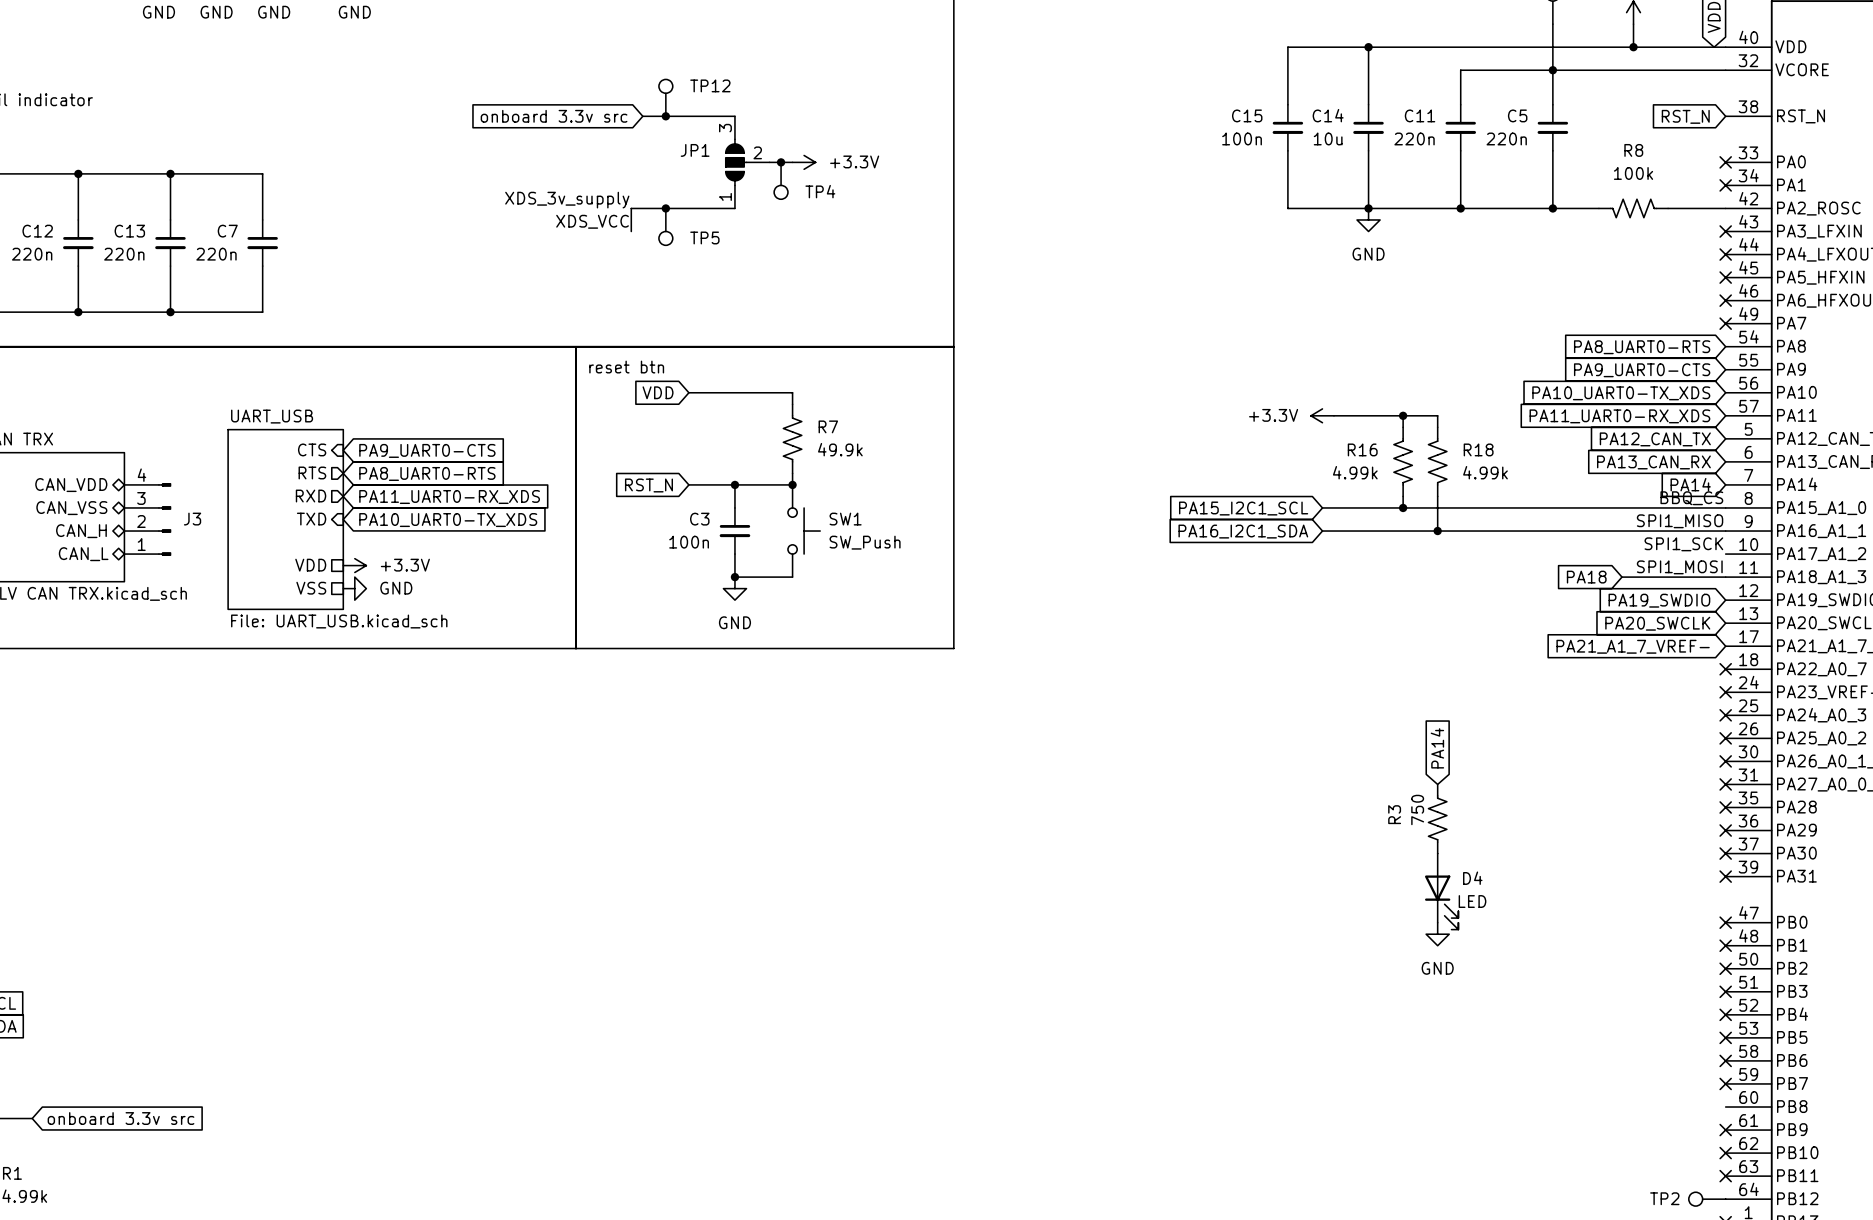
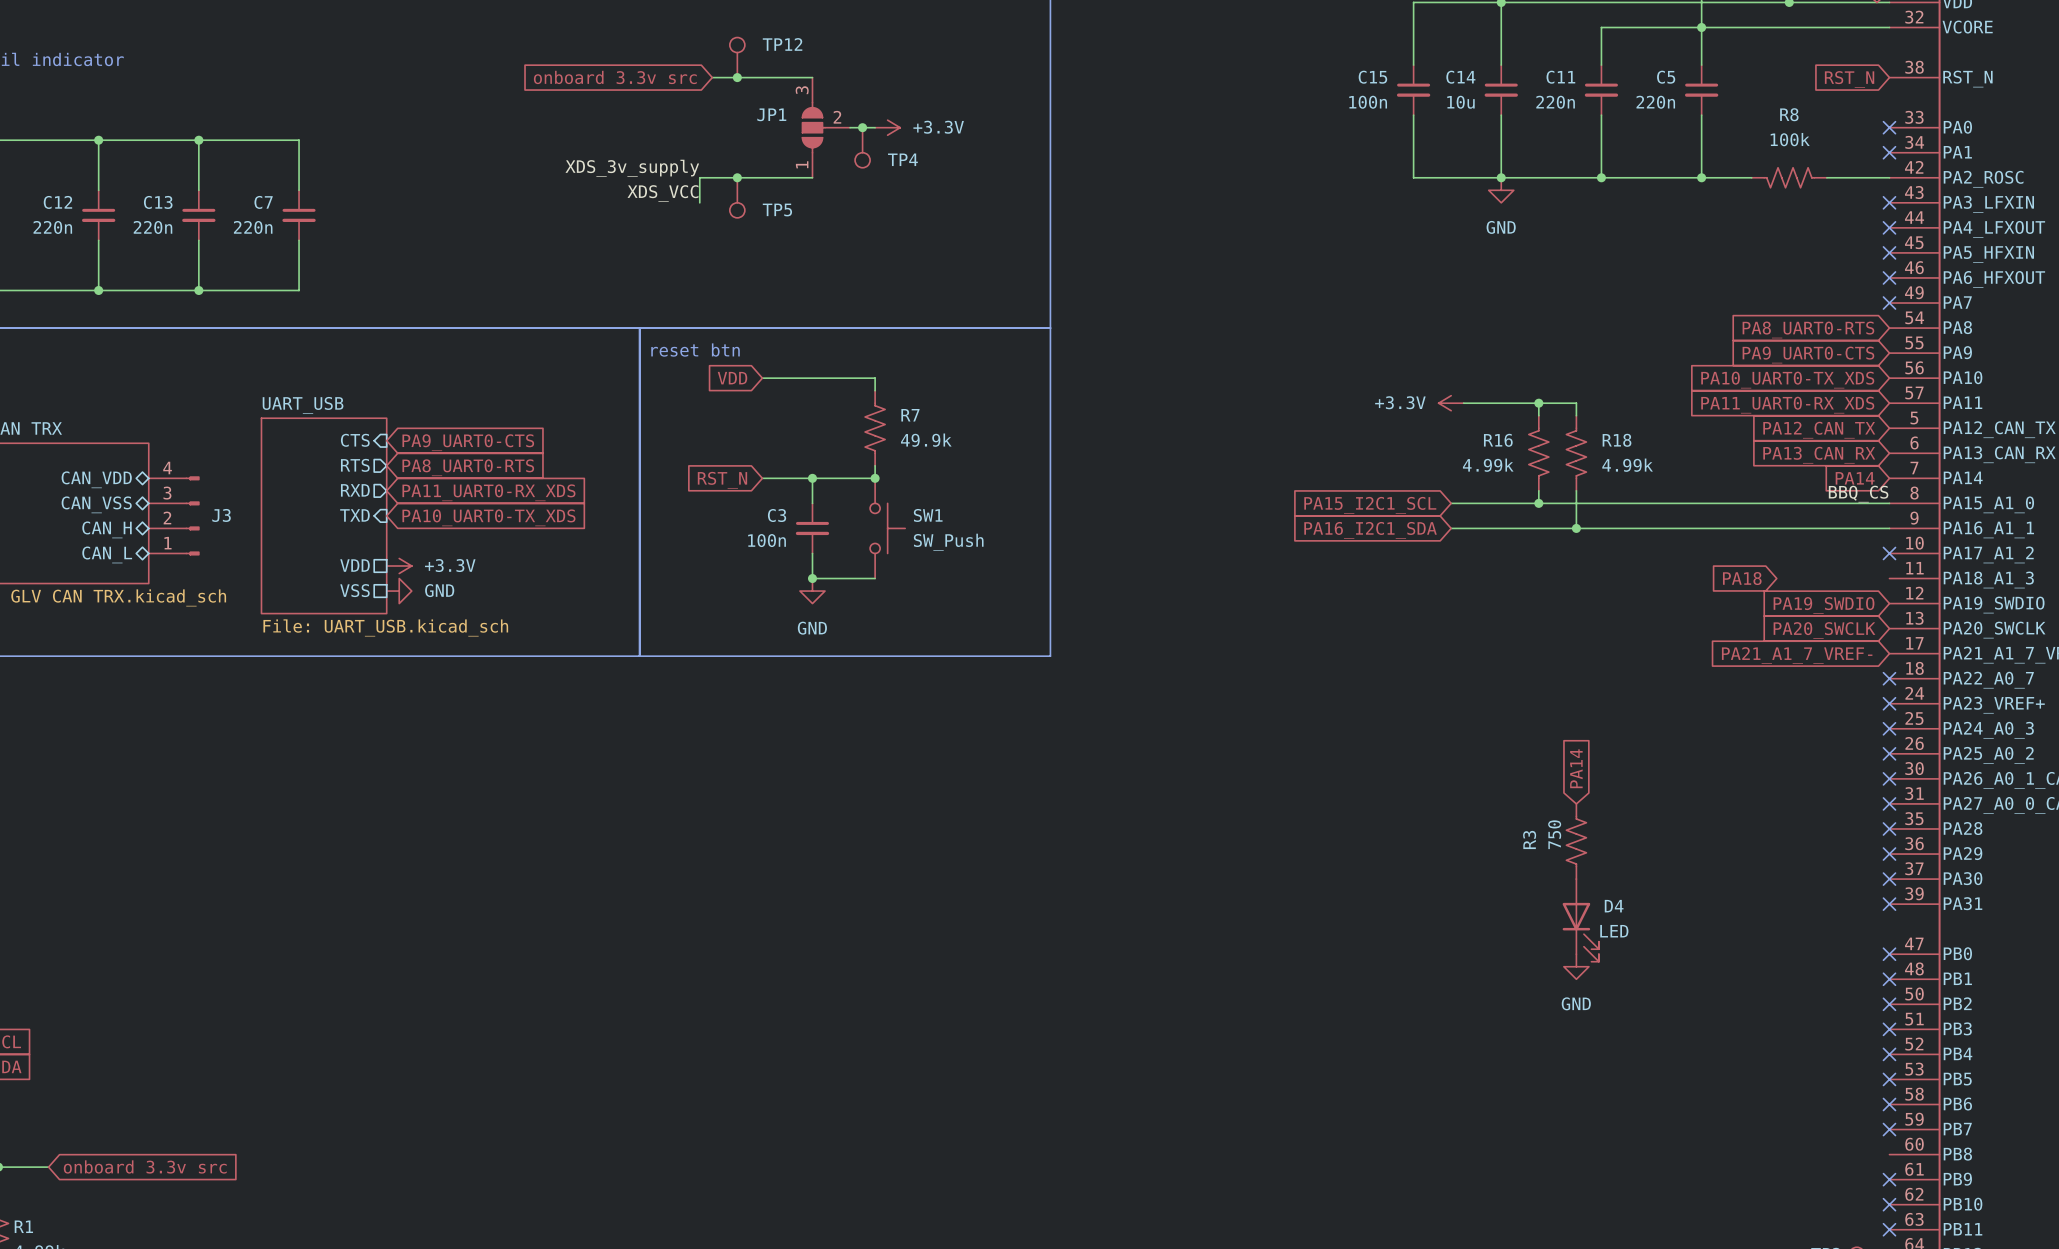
label: SPI1_MISO (1680, 521) -> none
label: SPI1_SCK (1683, 544) -> none
no-connect mark: none -> (1889, 553)
label: SPI1_MOSI (1679, 567) -> none
wire: (1621, 577) (1725, 577) -> none

